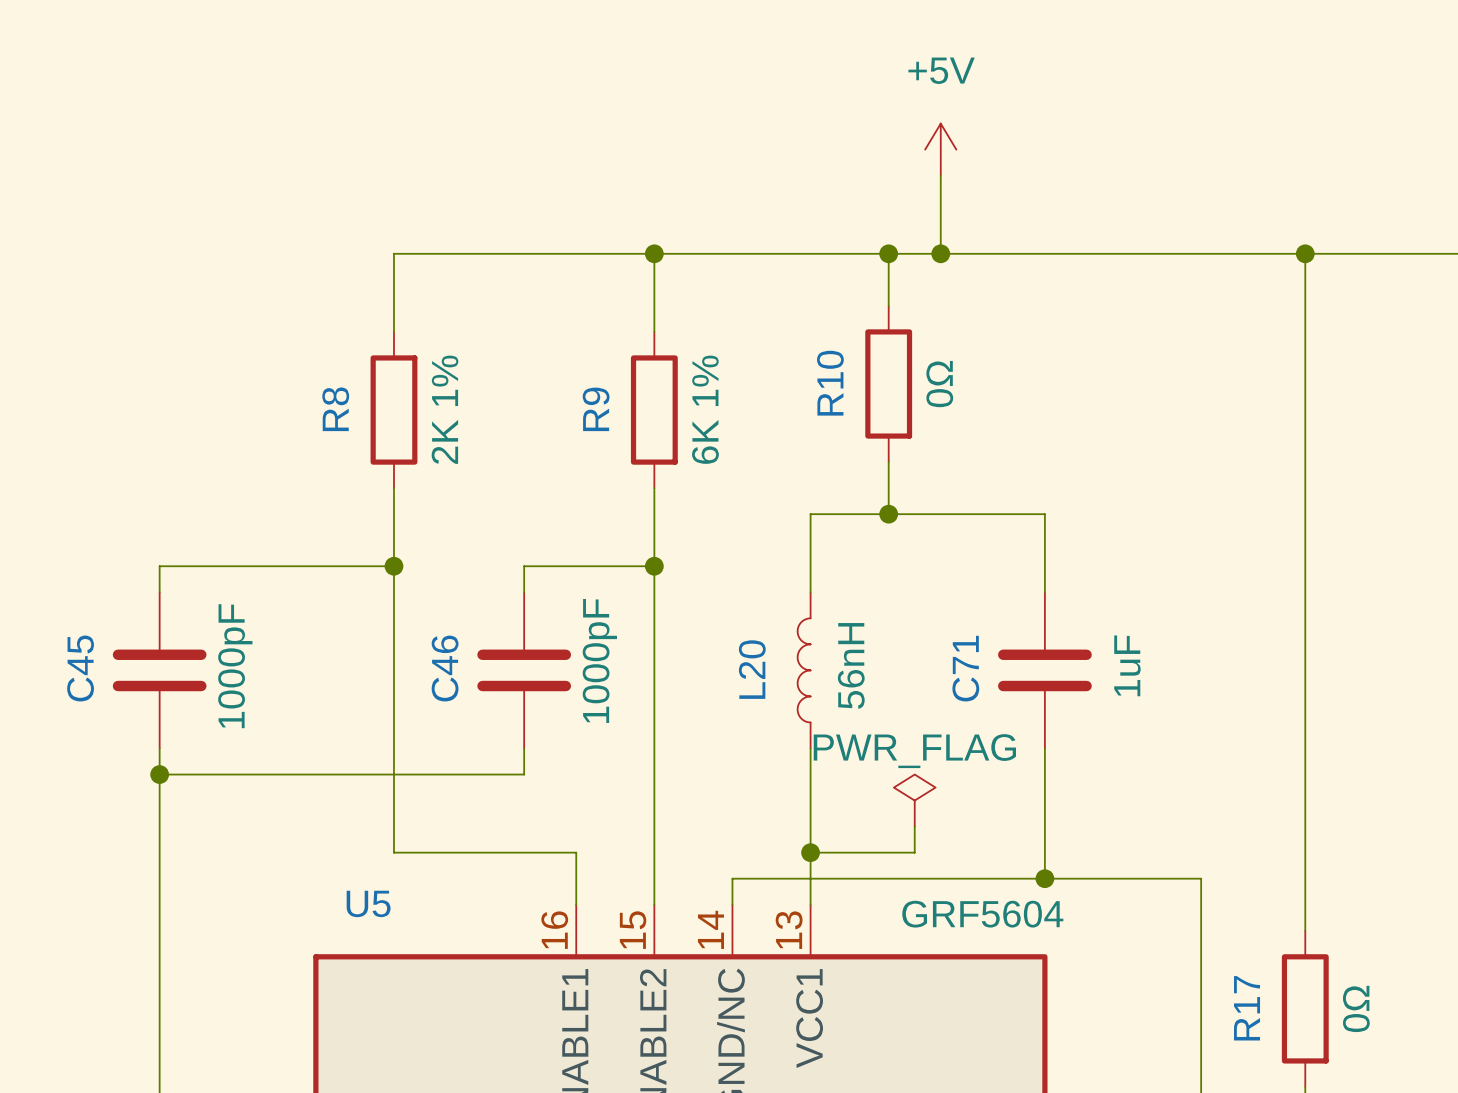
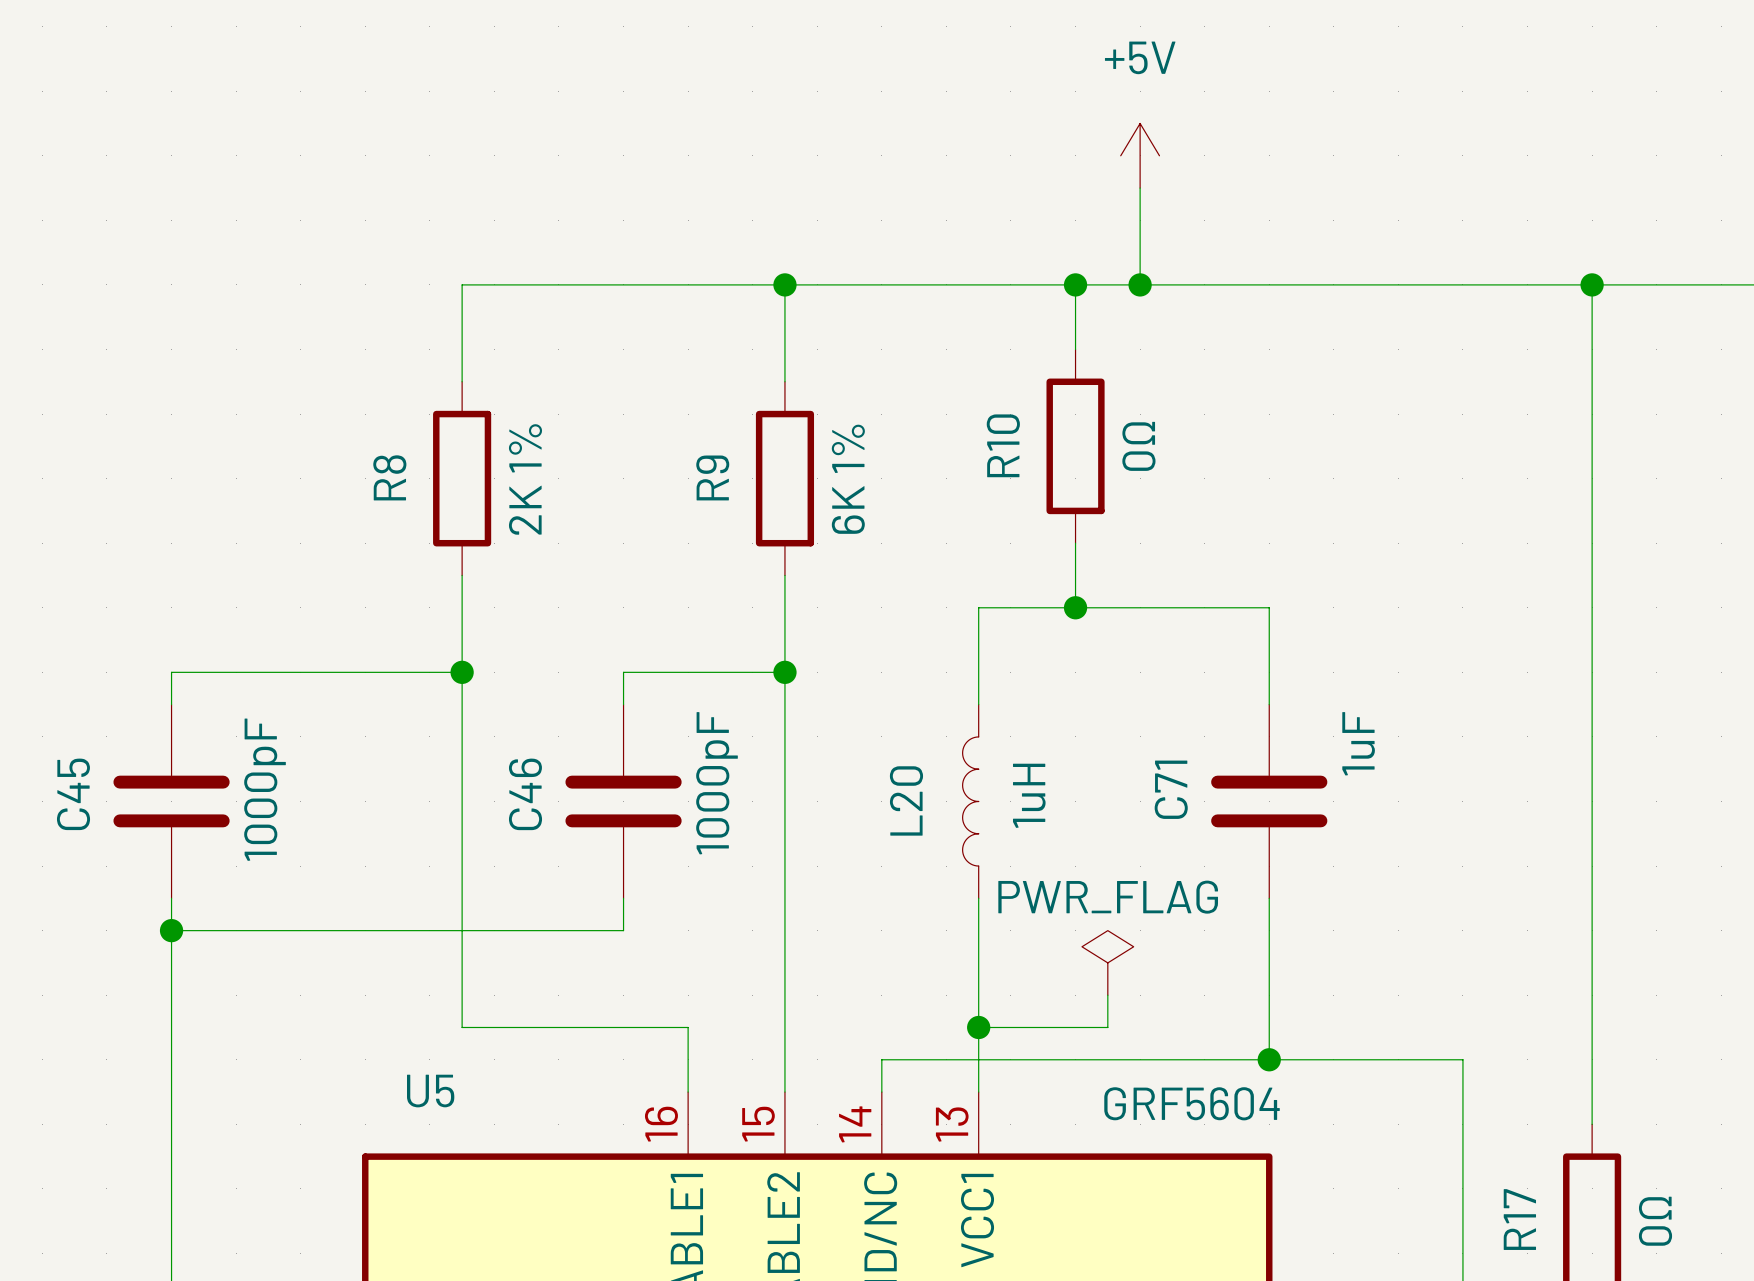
L20 value: 56nH (851, 665) -> 1uH (1029, 795)
C71 value position: 1uF (1127, 665) -> 1uF (1358, 743)

